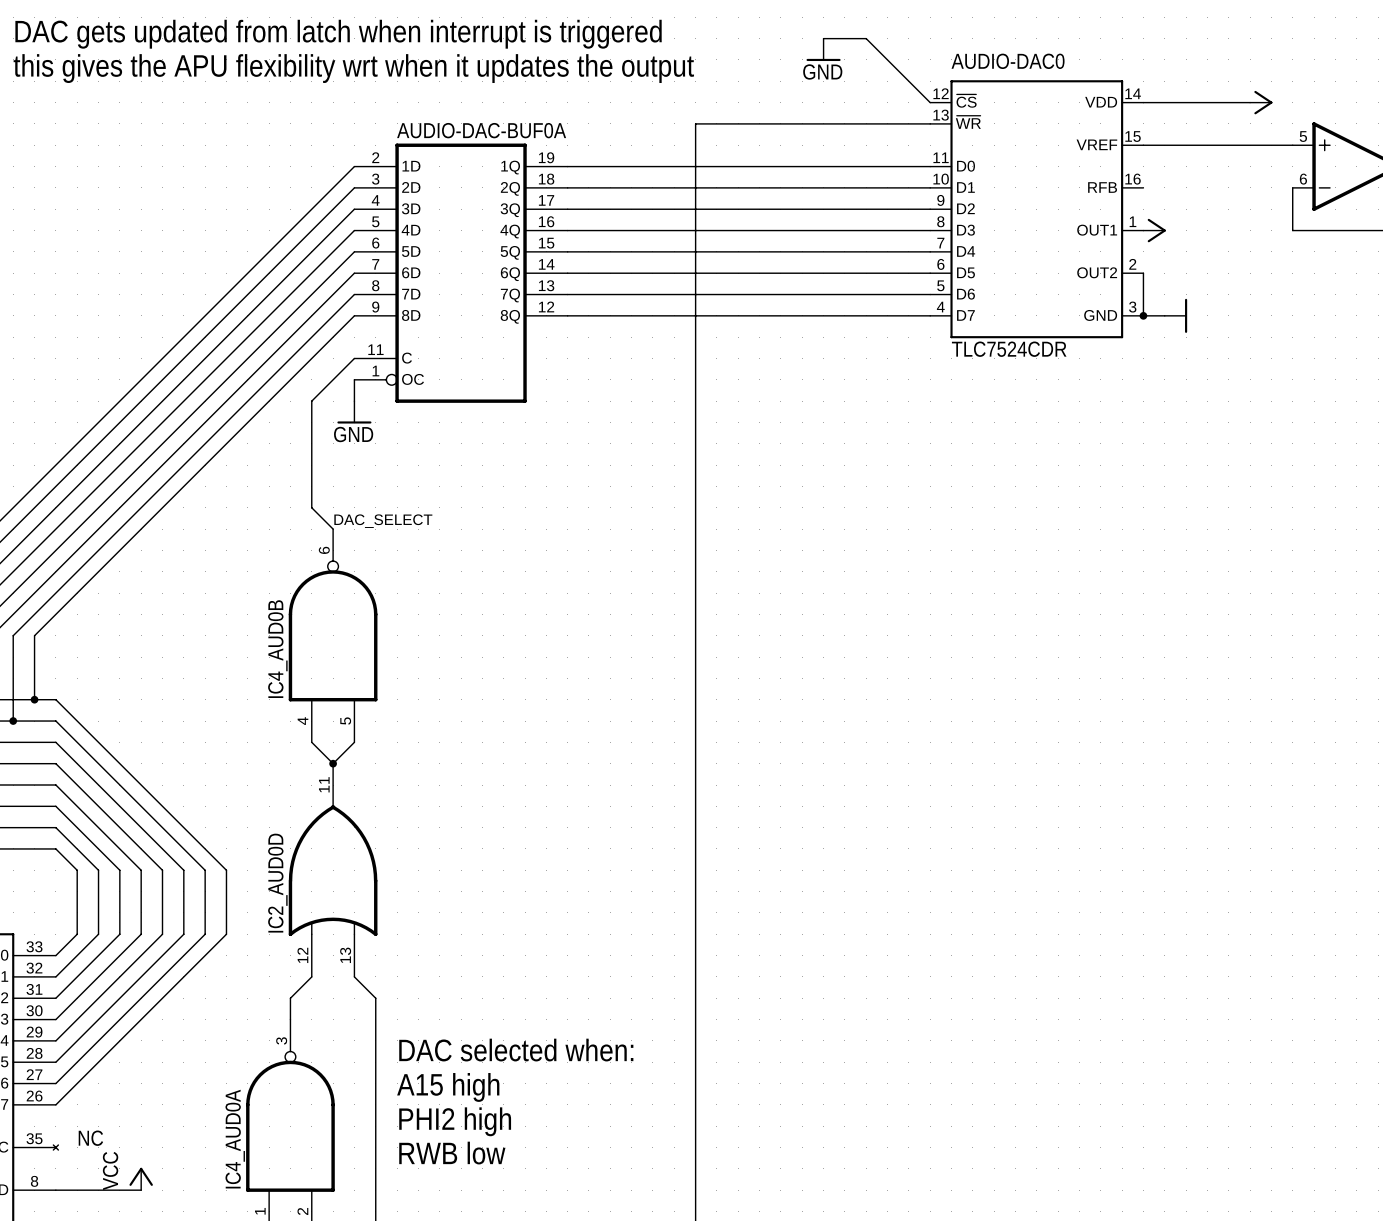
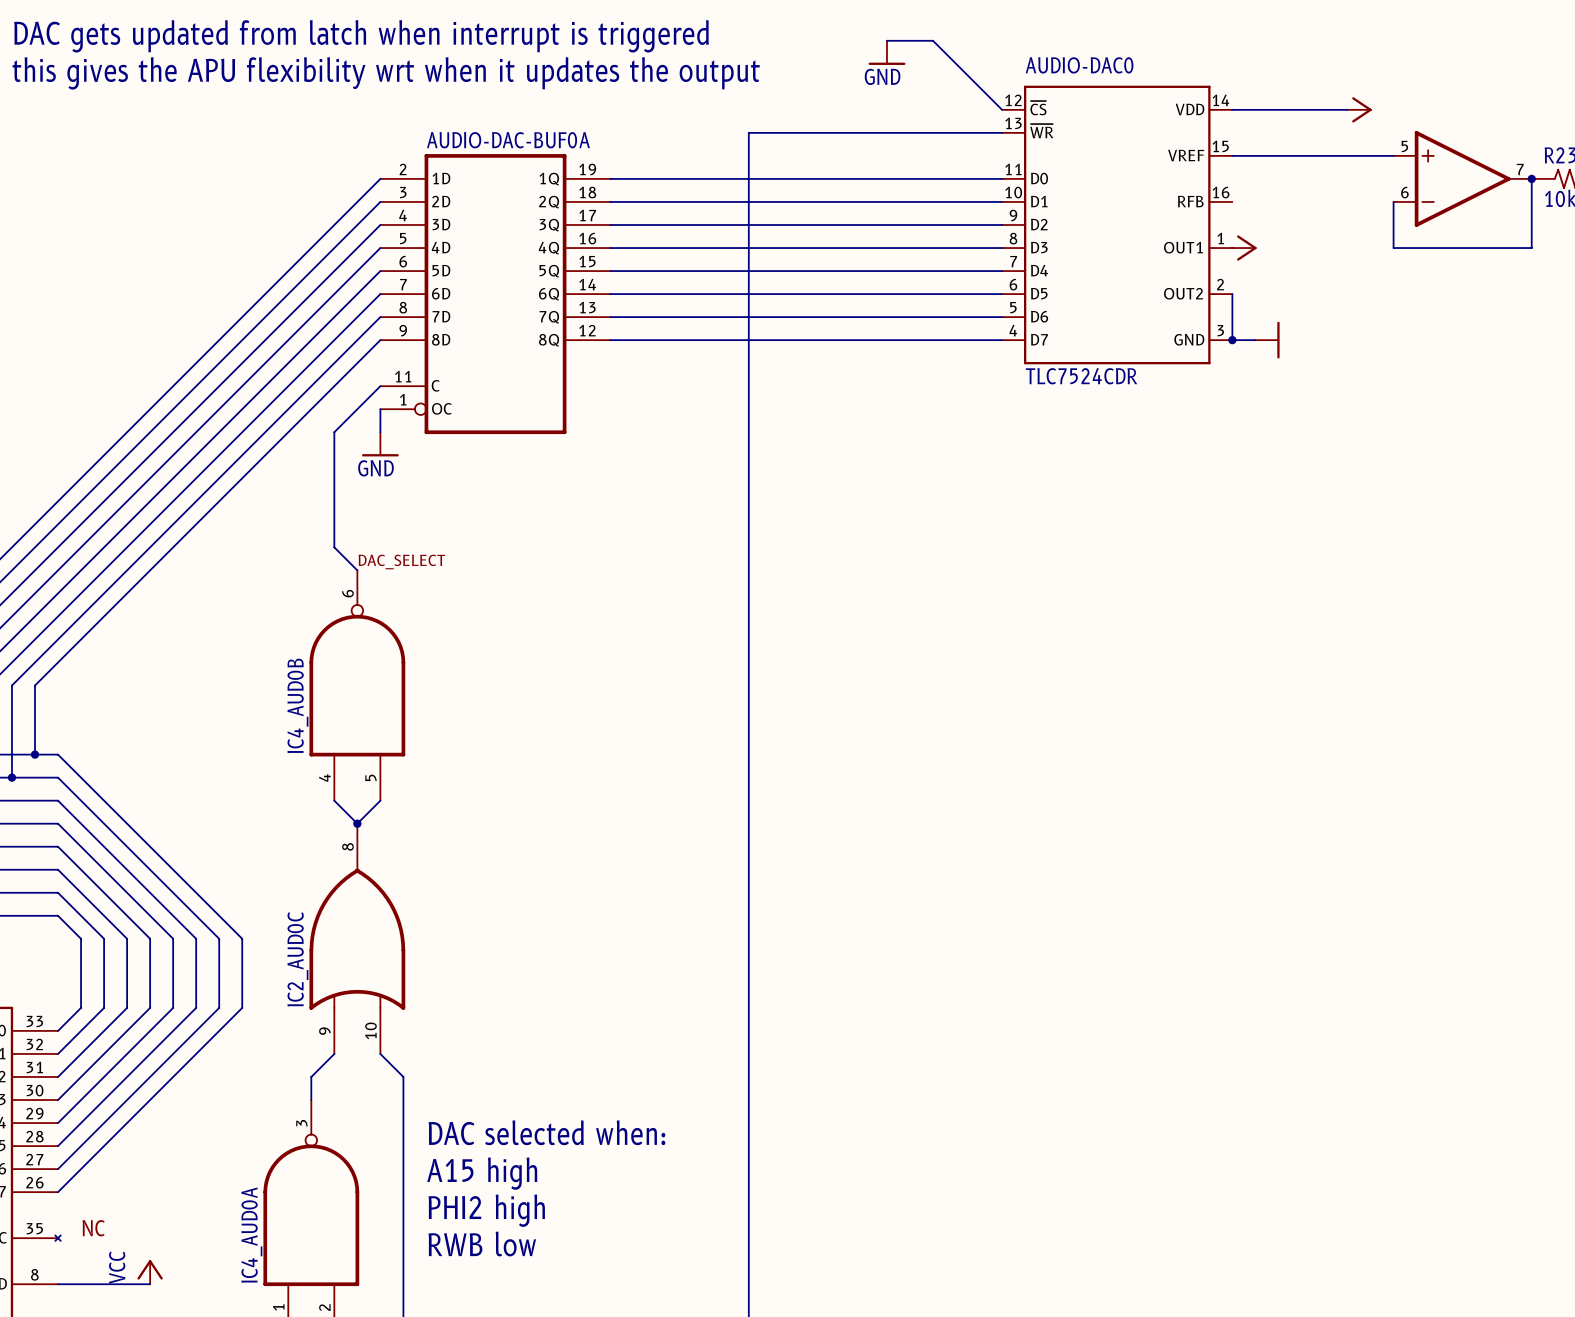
IC2_AUD0D pin number: 11 (324, 784) -> 8 (347, 846)
IC2_AUD0D name: IC2_AUD0D (277, 883) -> IC2_AUD0C (297, 959)
IC2_AUD0D pin number: 12 (302, 955) -> 9 (324, 1031)
IC2_AUD0D pin number: 13 (345, 955) -> 10 (370, 1030)

